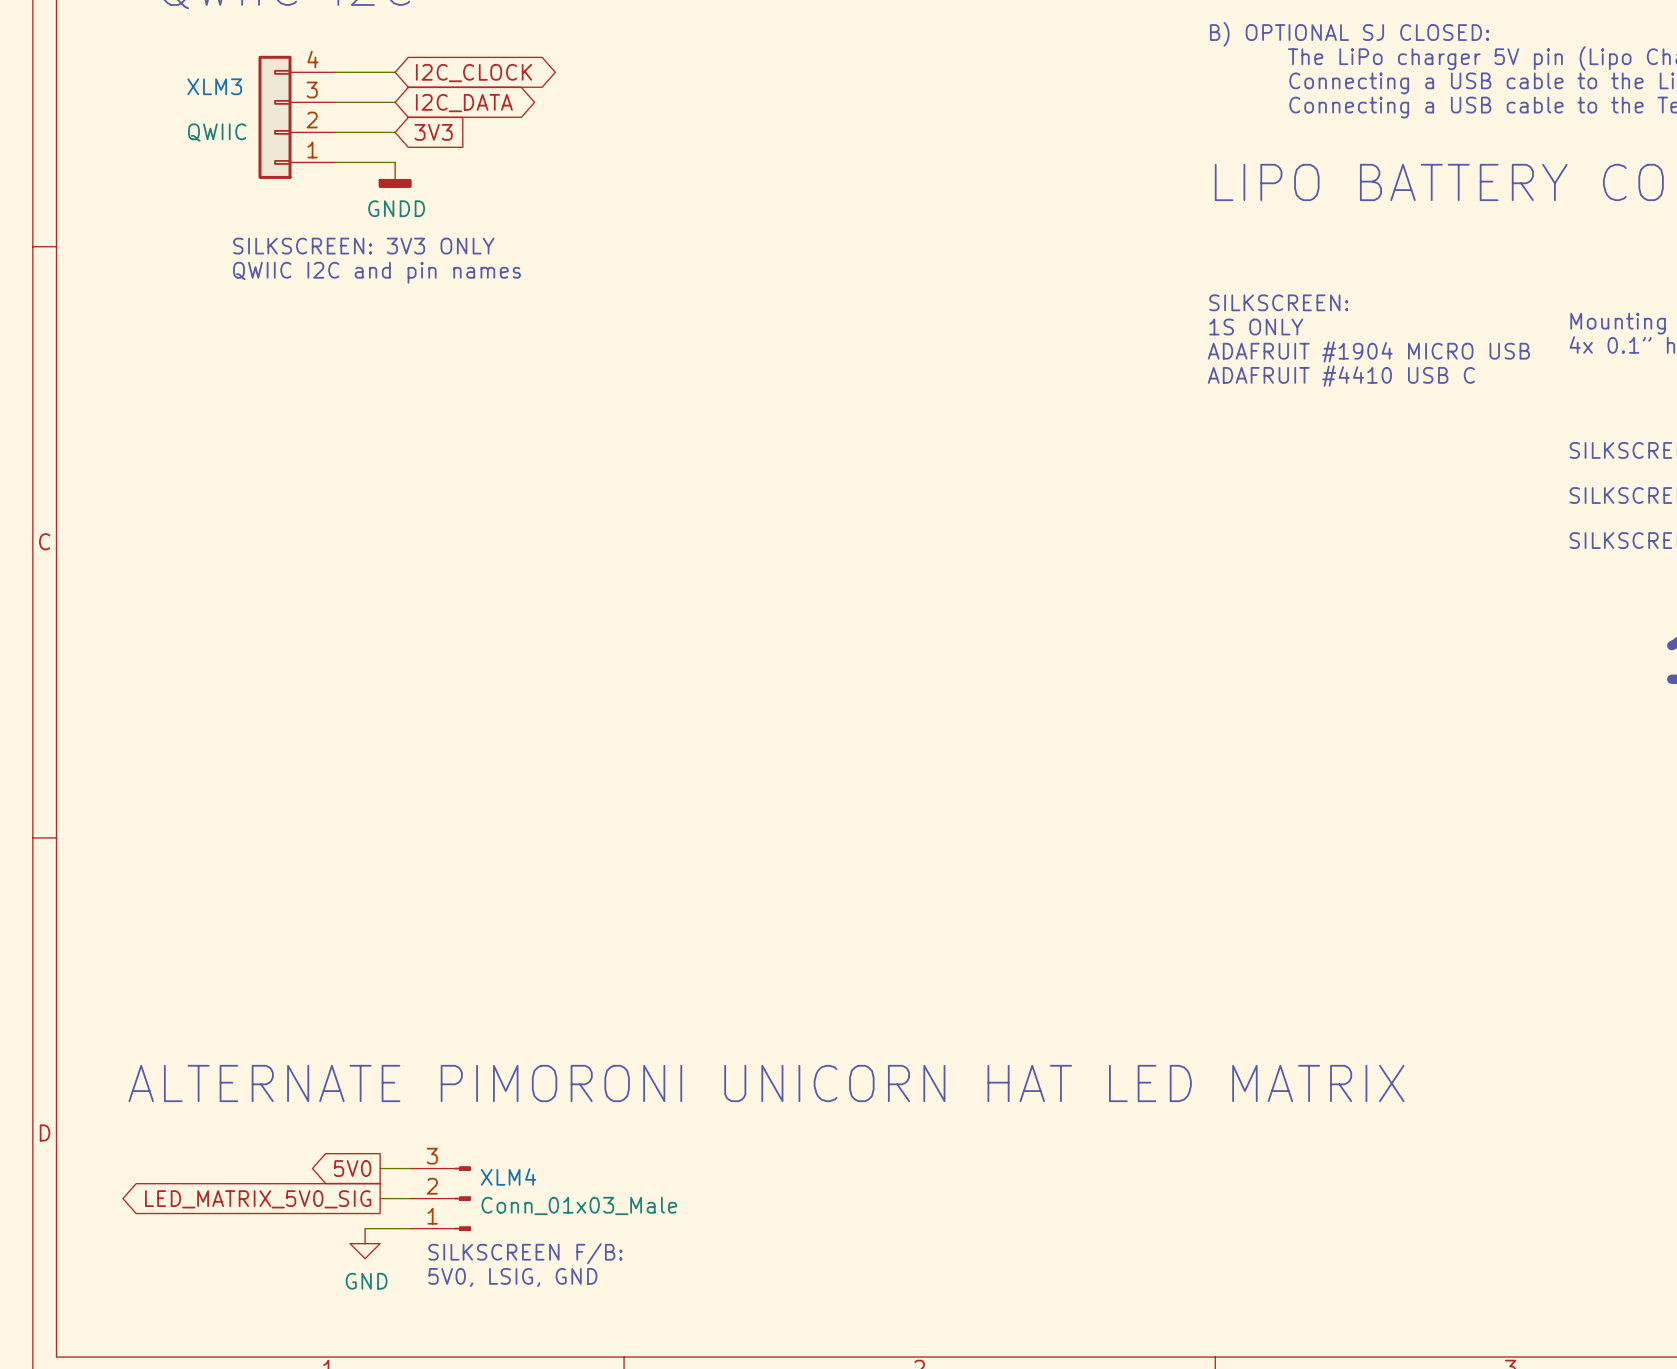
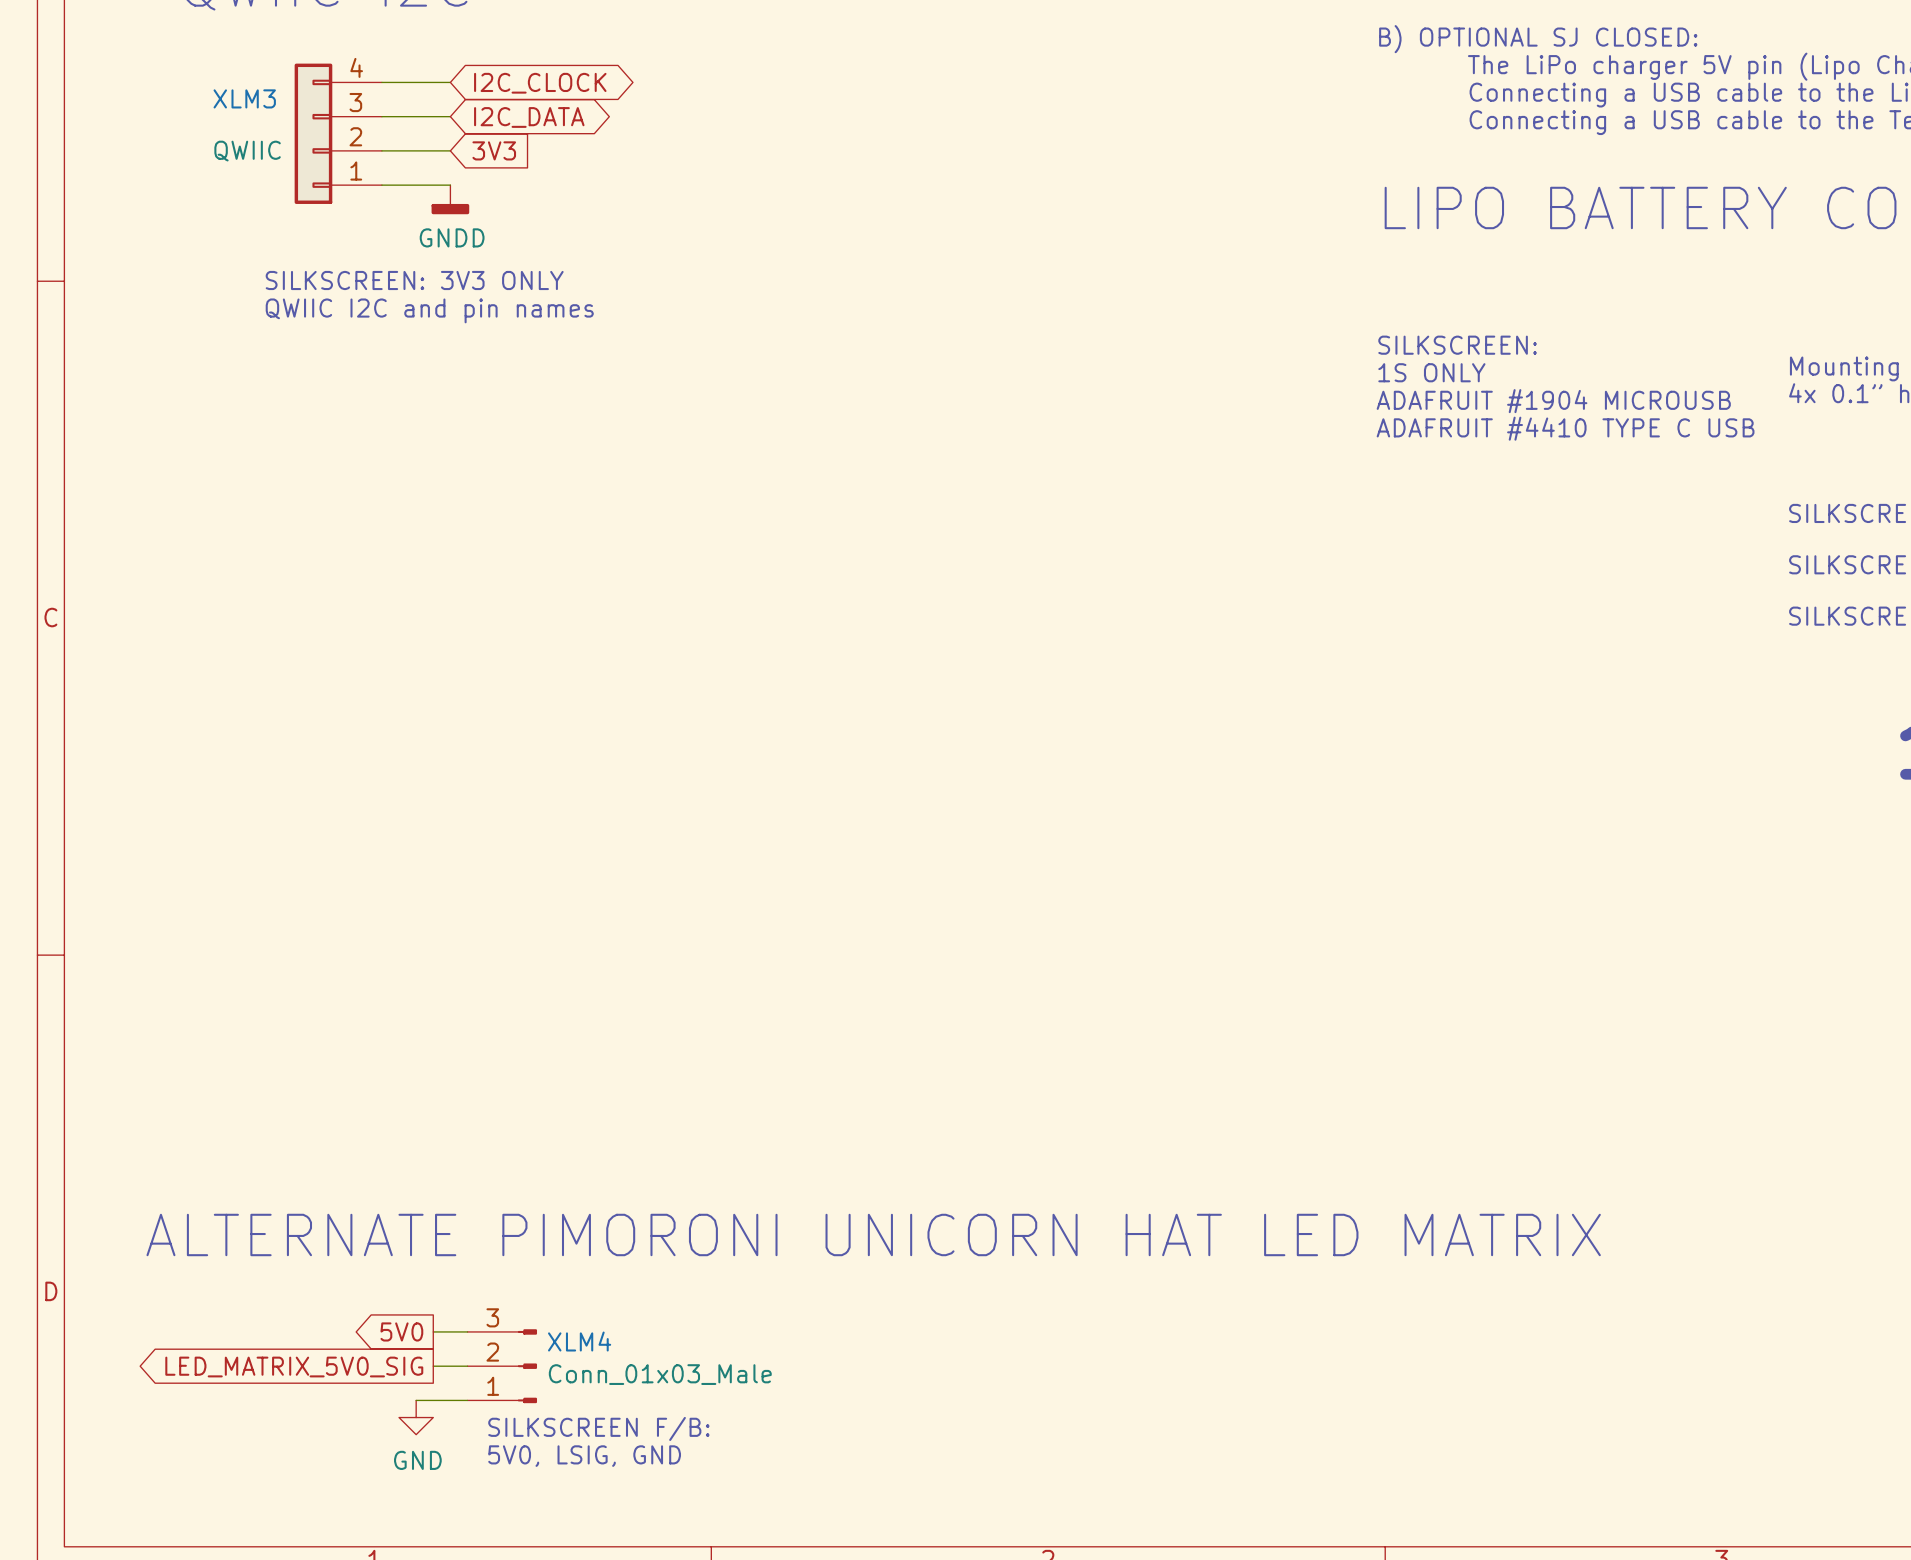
text: ADAFRUIT #1904 MICRO USB (1368, 351) -> ADAFRUIT #1904 MICROUSB (1553, 401)
text: ADAFRUIT #4410 USB C (1341, 376) -> ADAFRUIT #4410 TYPE C USB (1565, 428)

